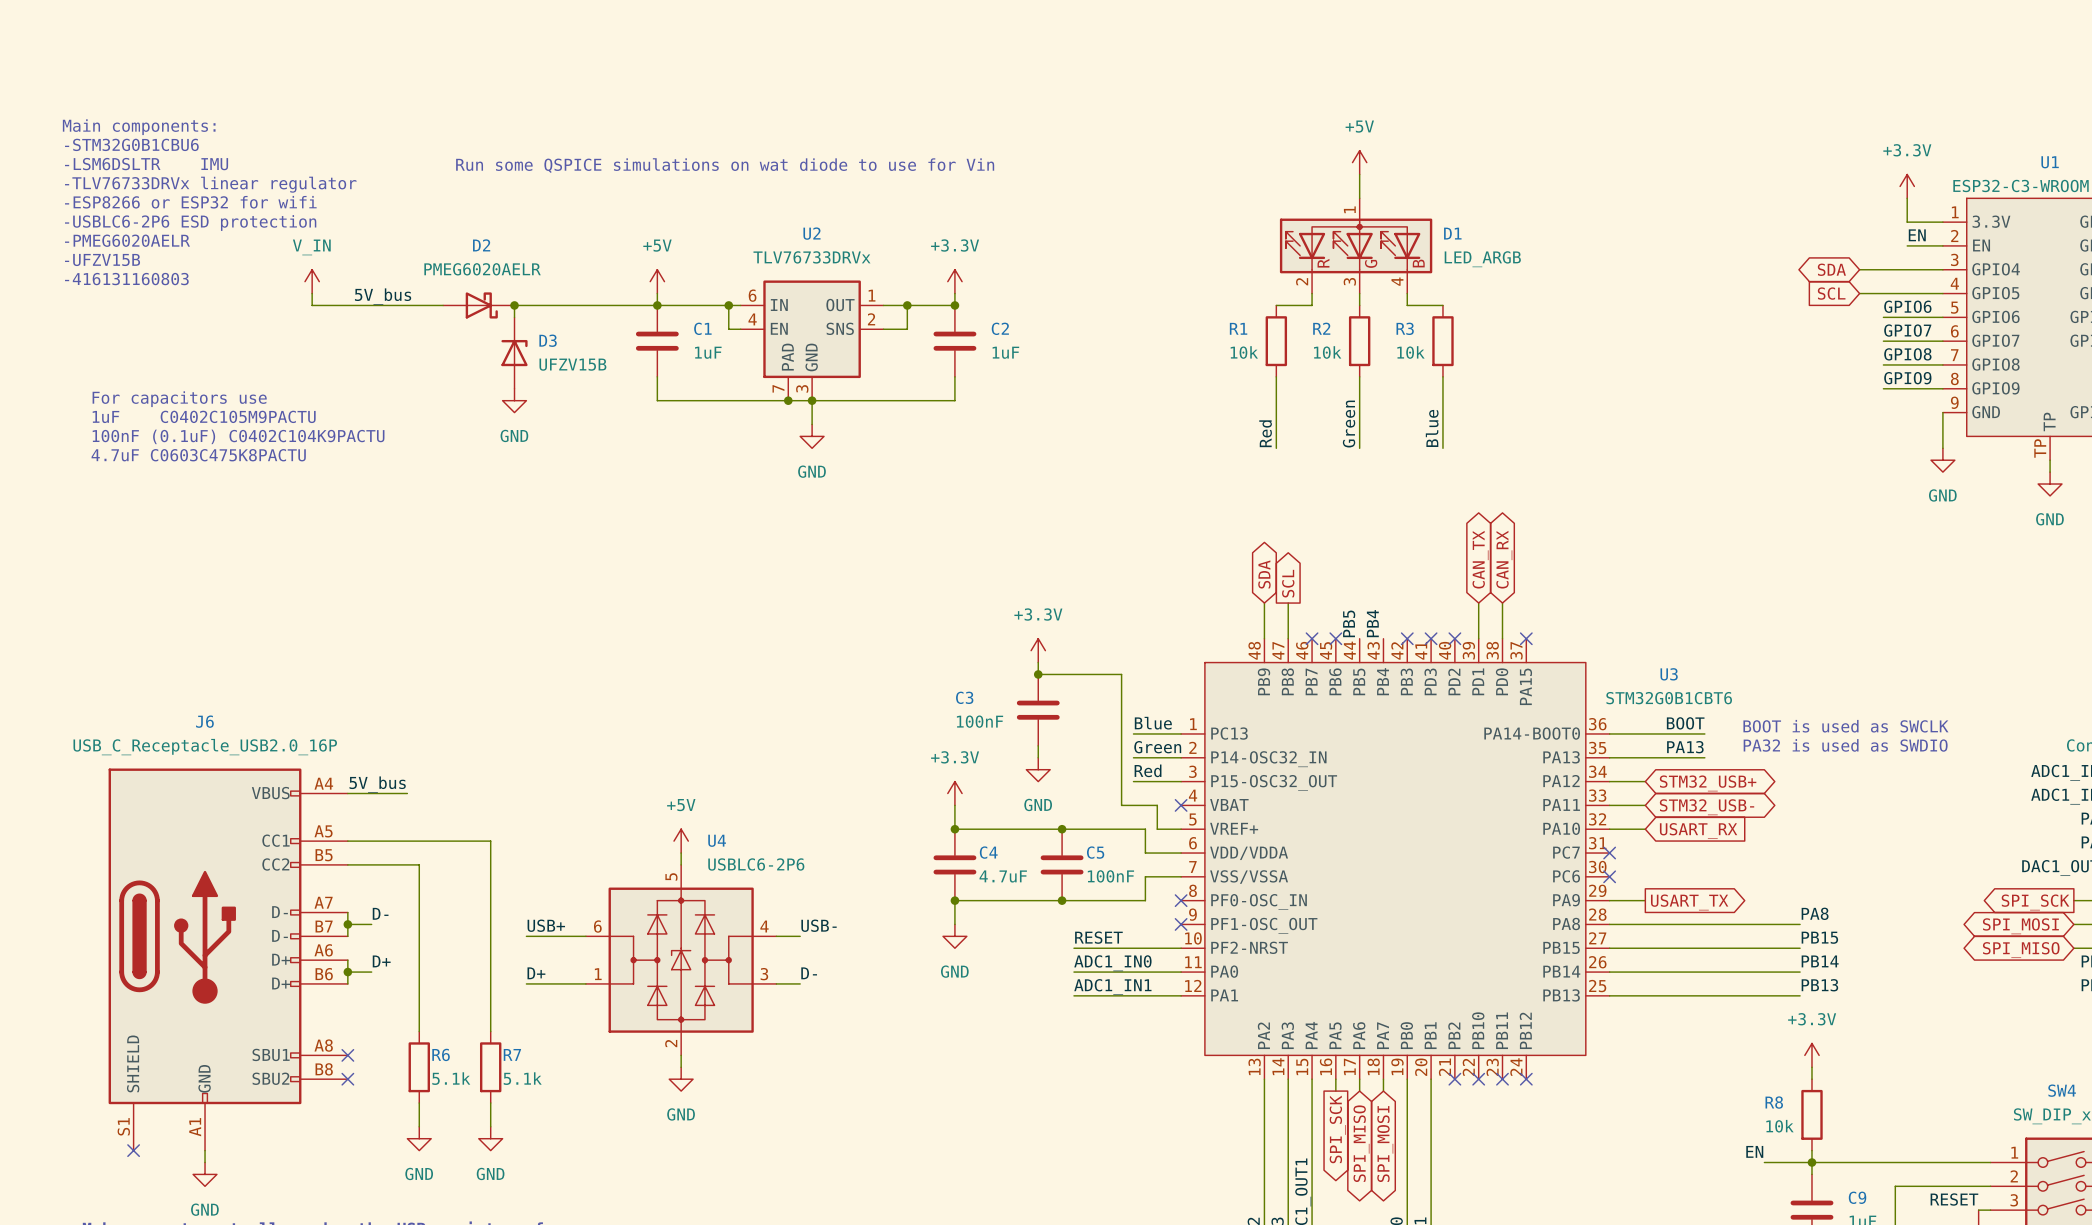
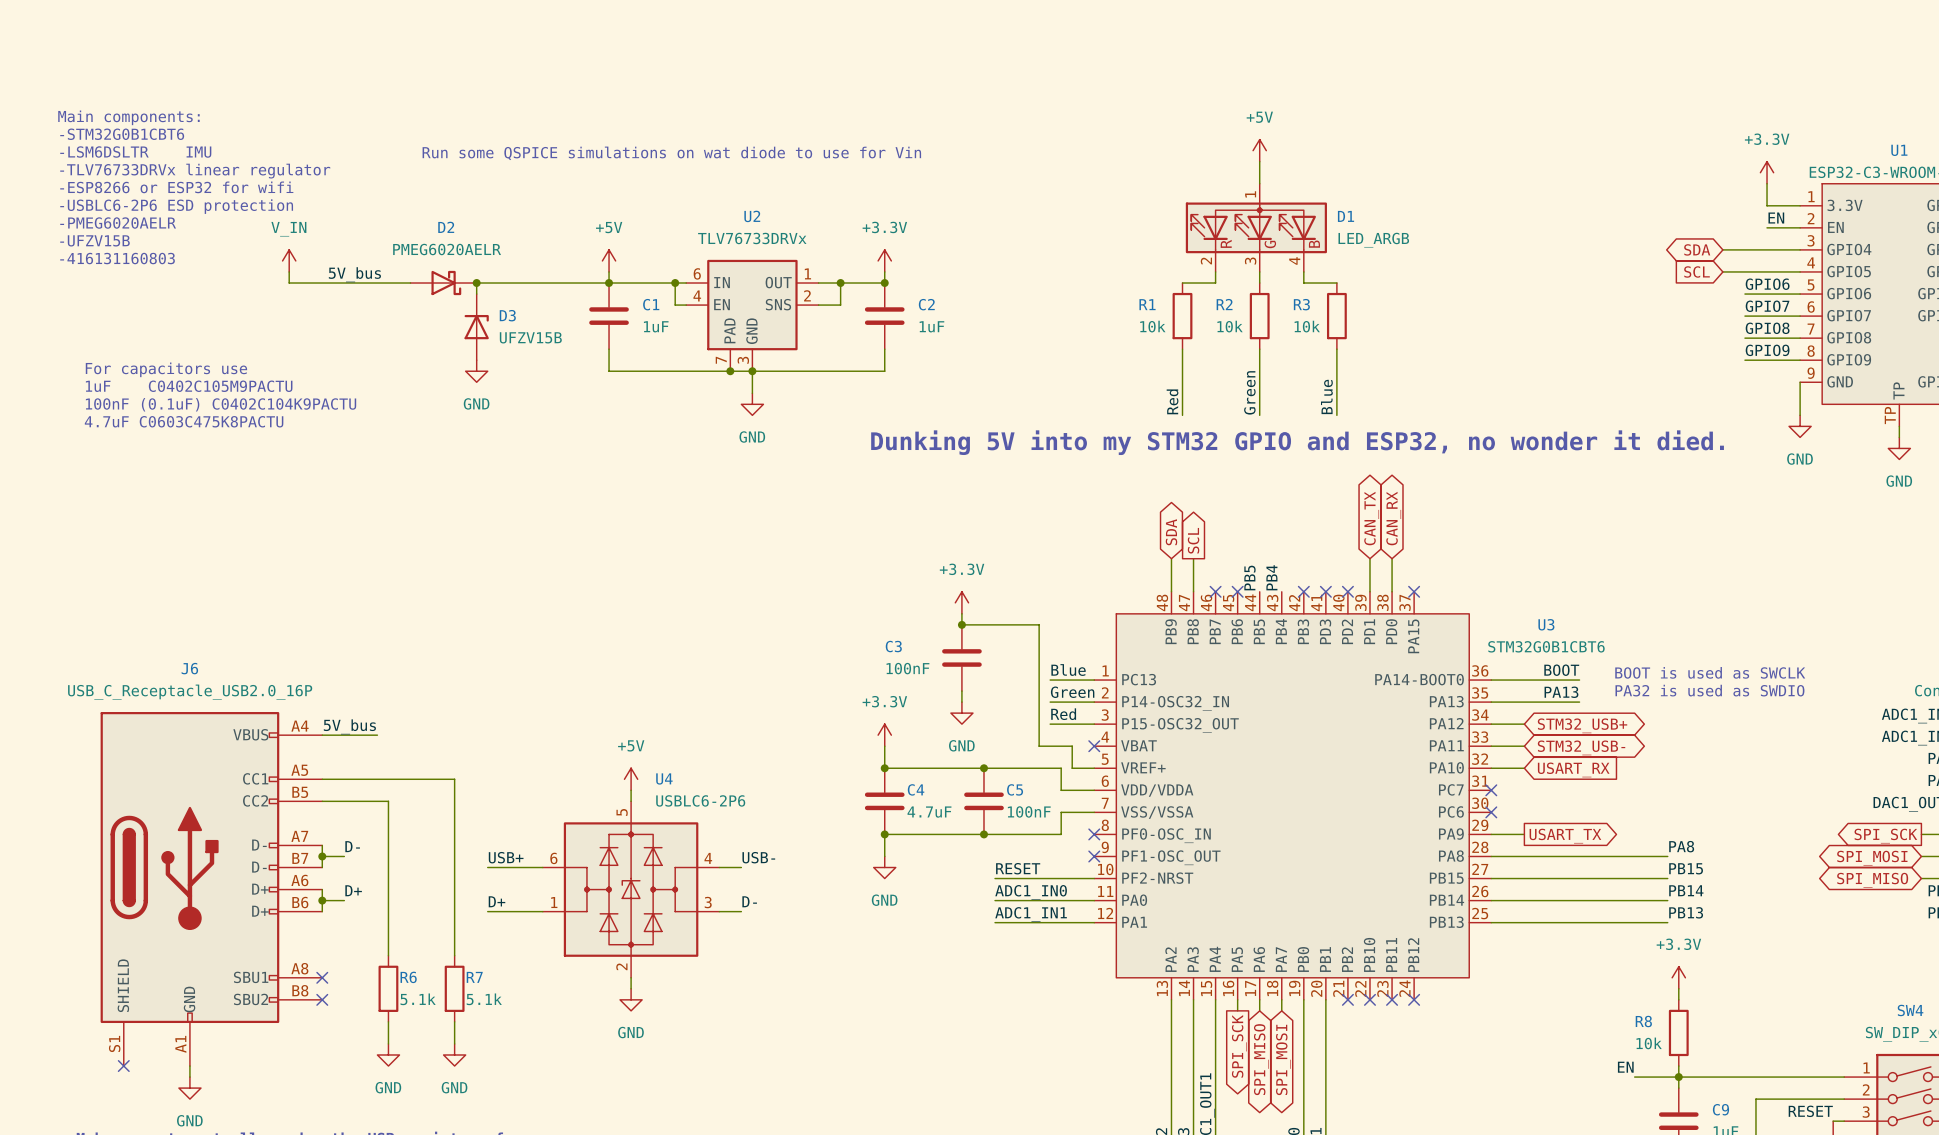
text: -STM32G0B1CBU6 (131, 144) -> -STM32G0B1CBT6 (122, 134)
text: none -> Dunking 5V into my STM32 GPIO and ESP32, no wonder it died. (1297, 442)

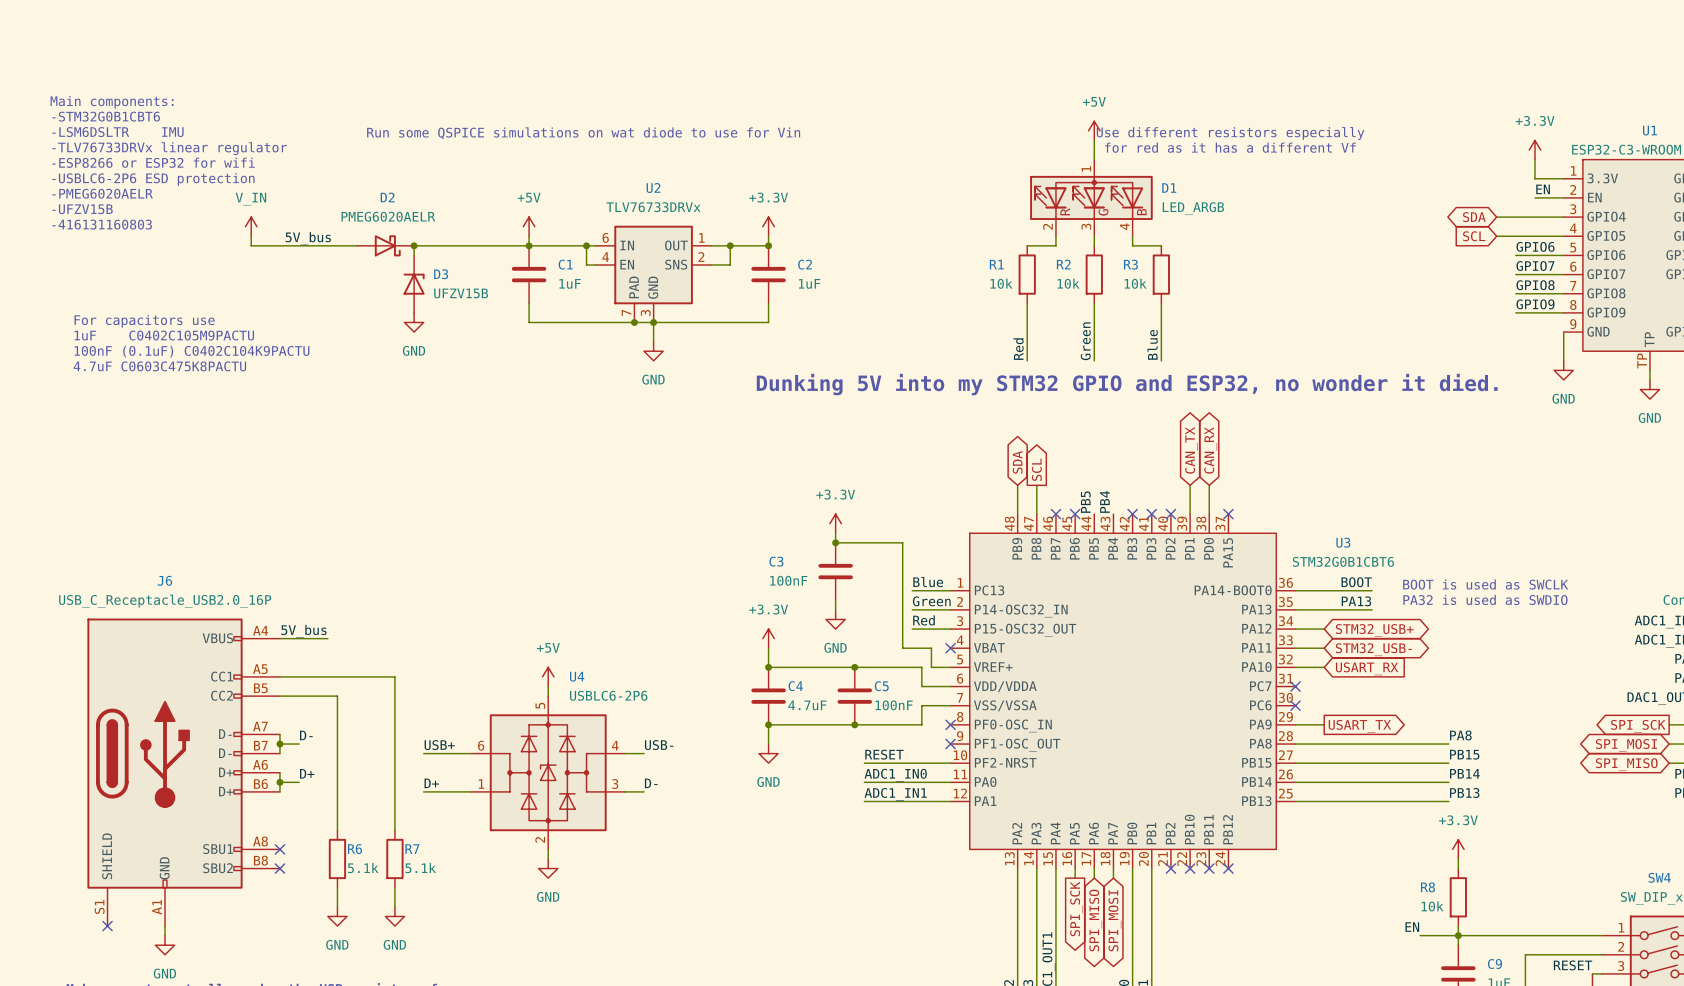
text: none -> Use different resistors especially (1230, 133)
text: none -> for red as it has a different Vf (1230, 147)

